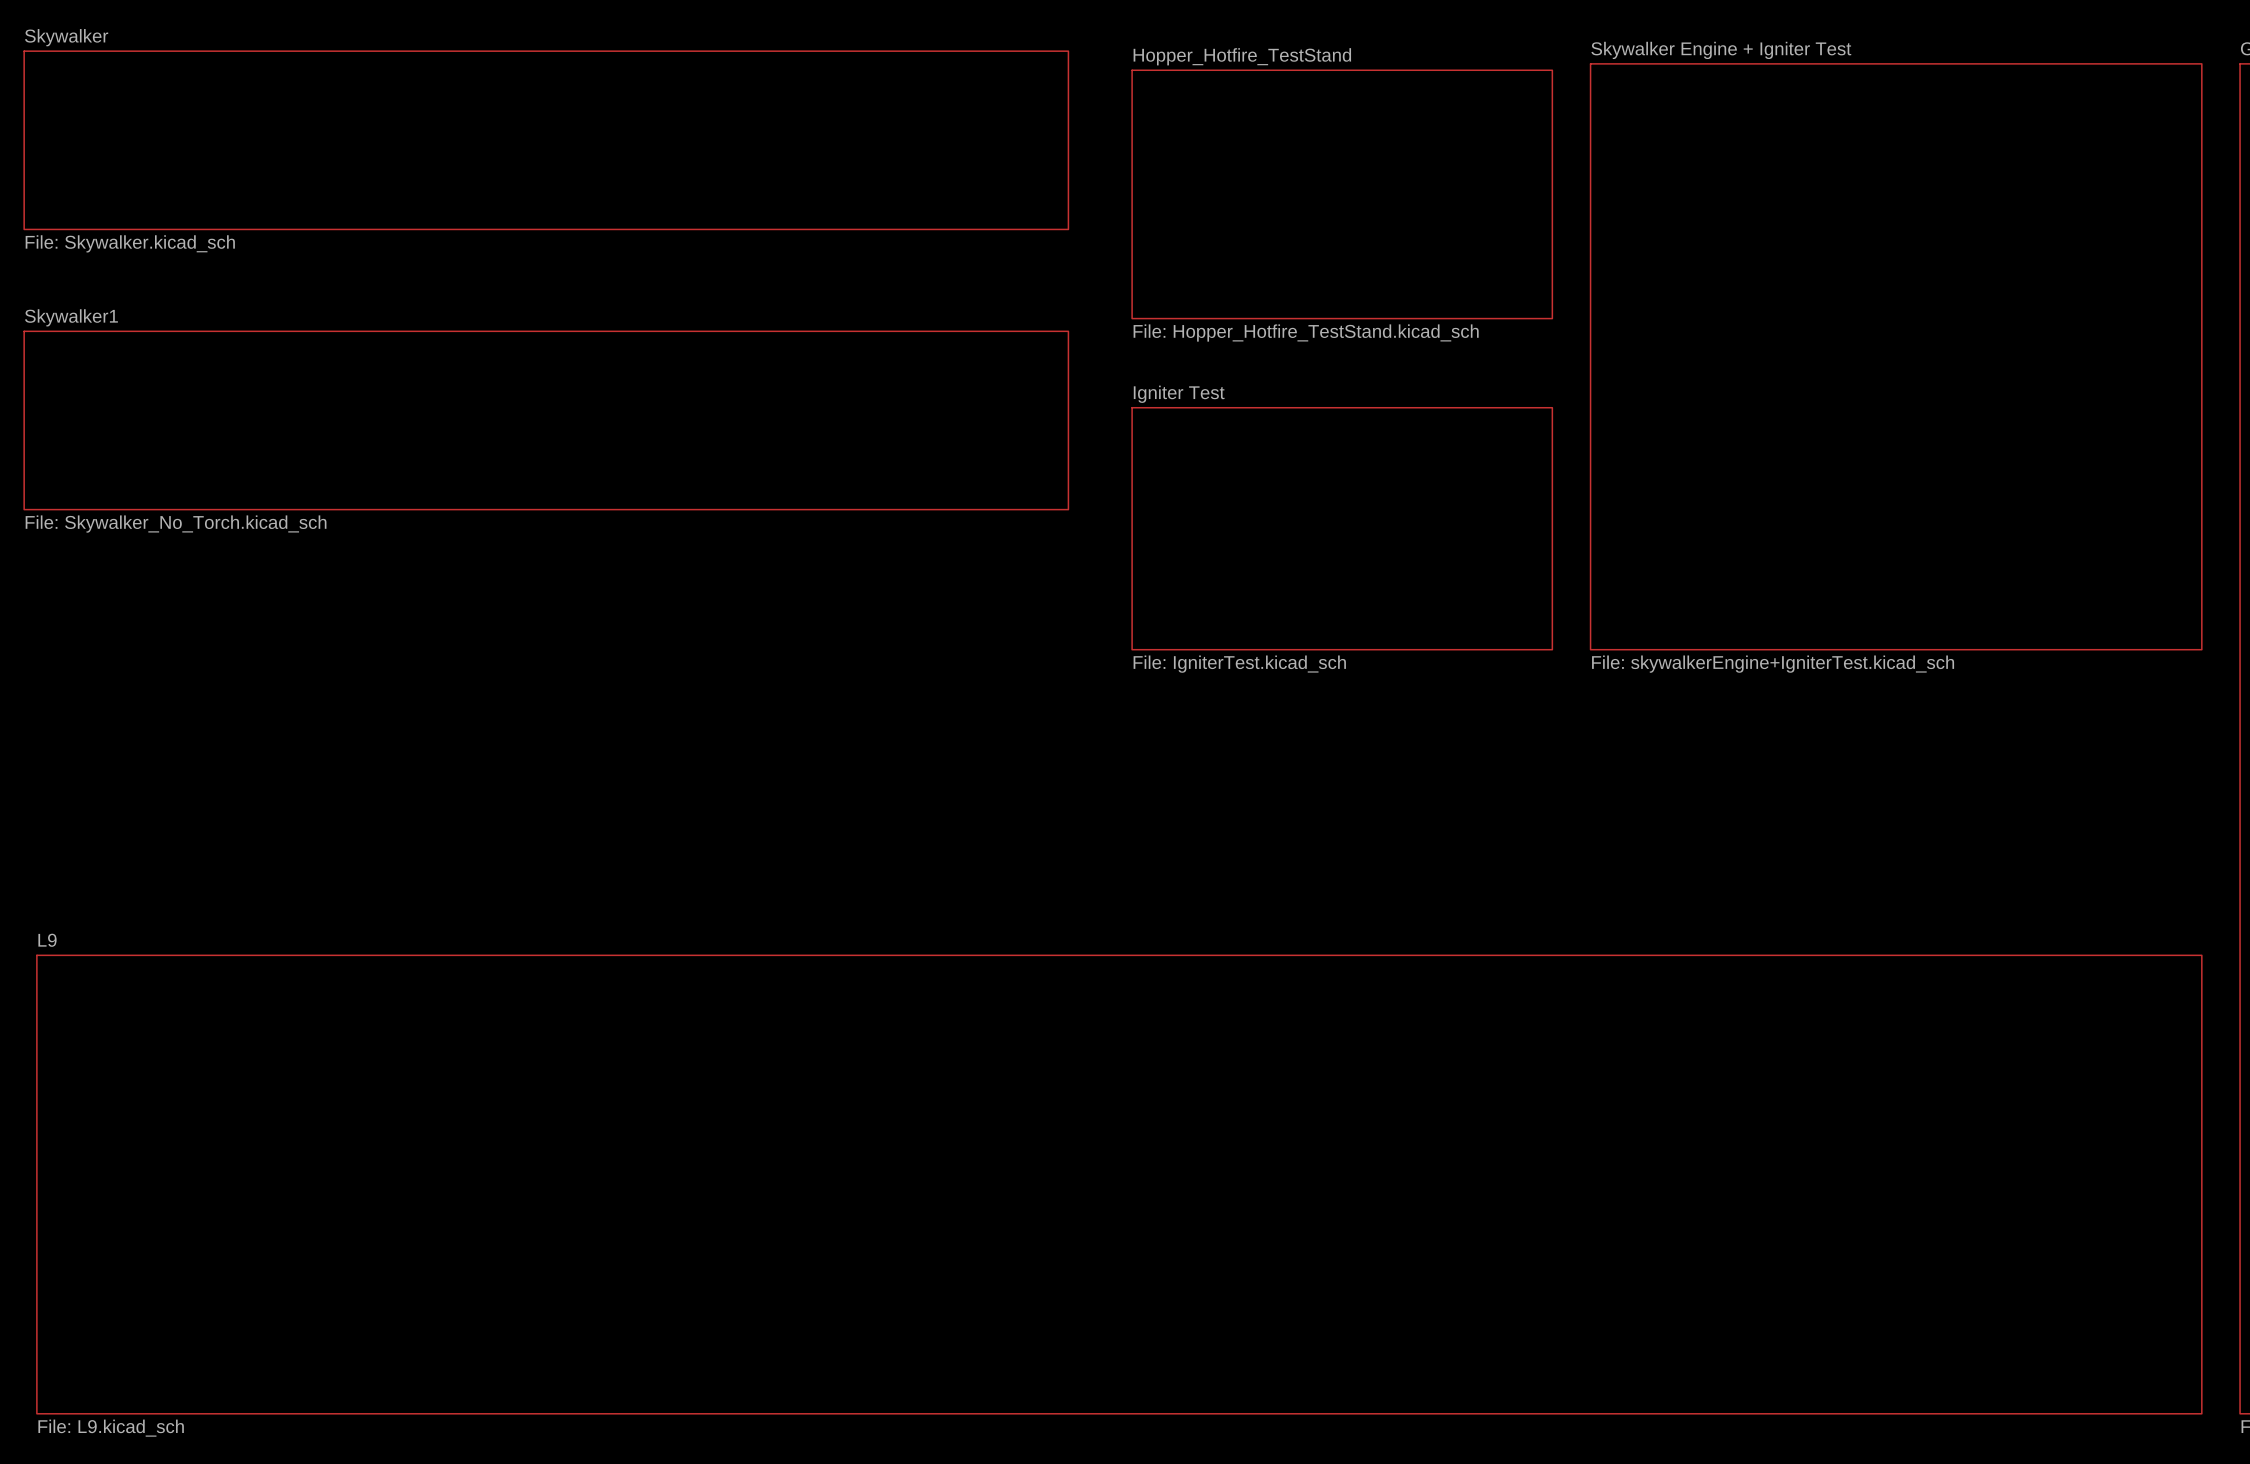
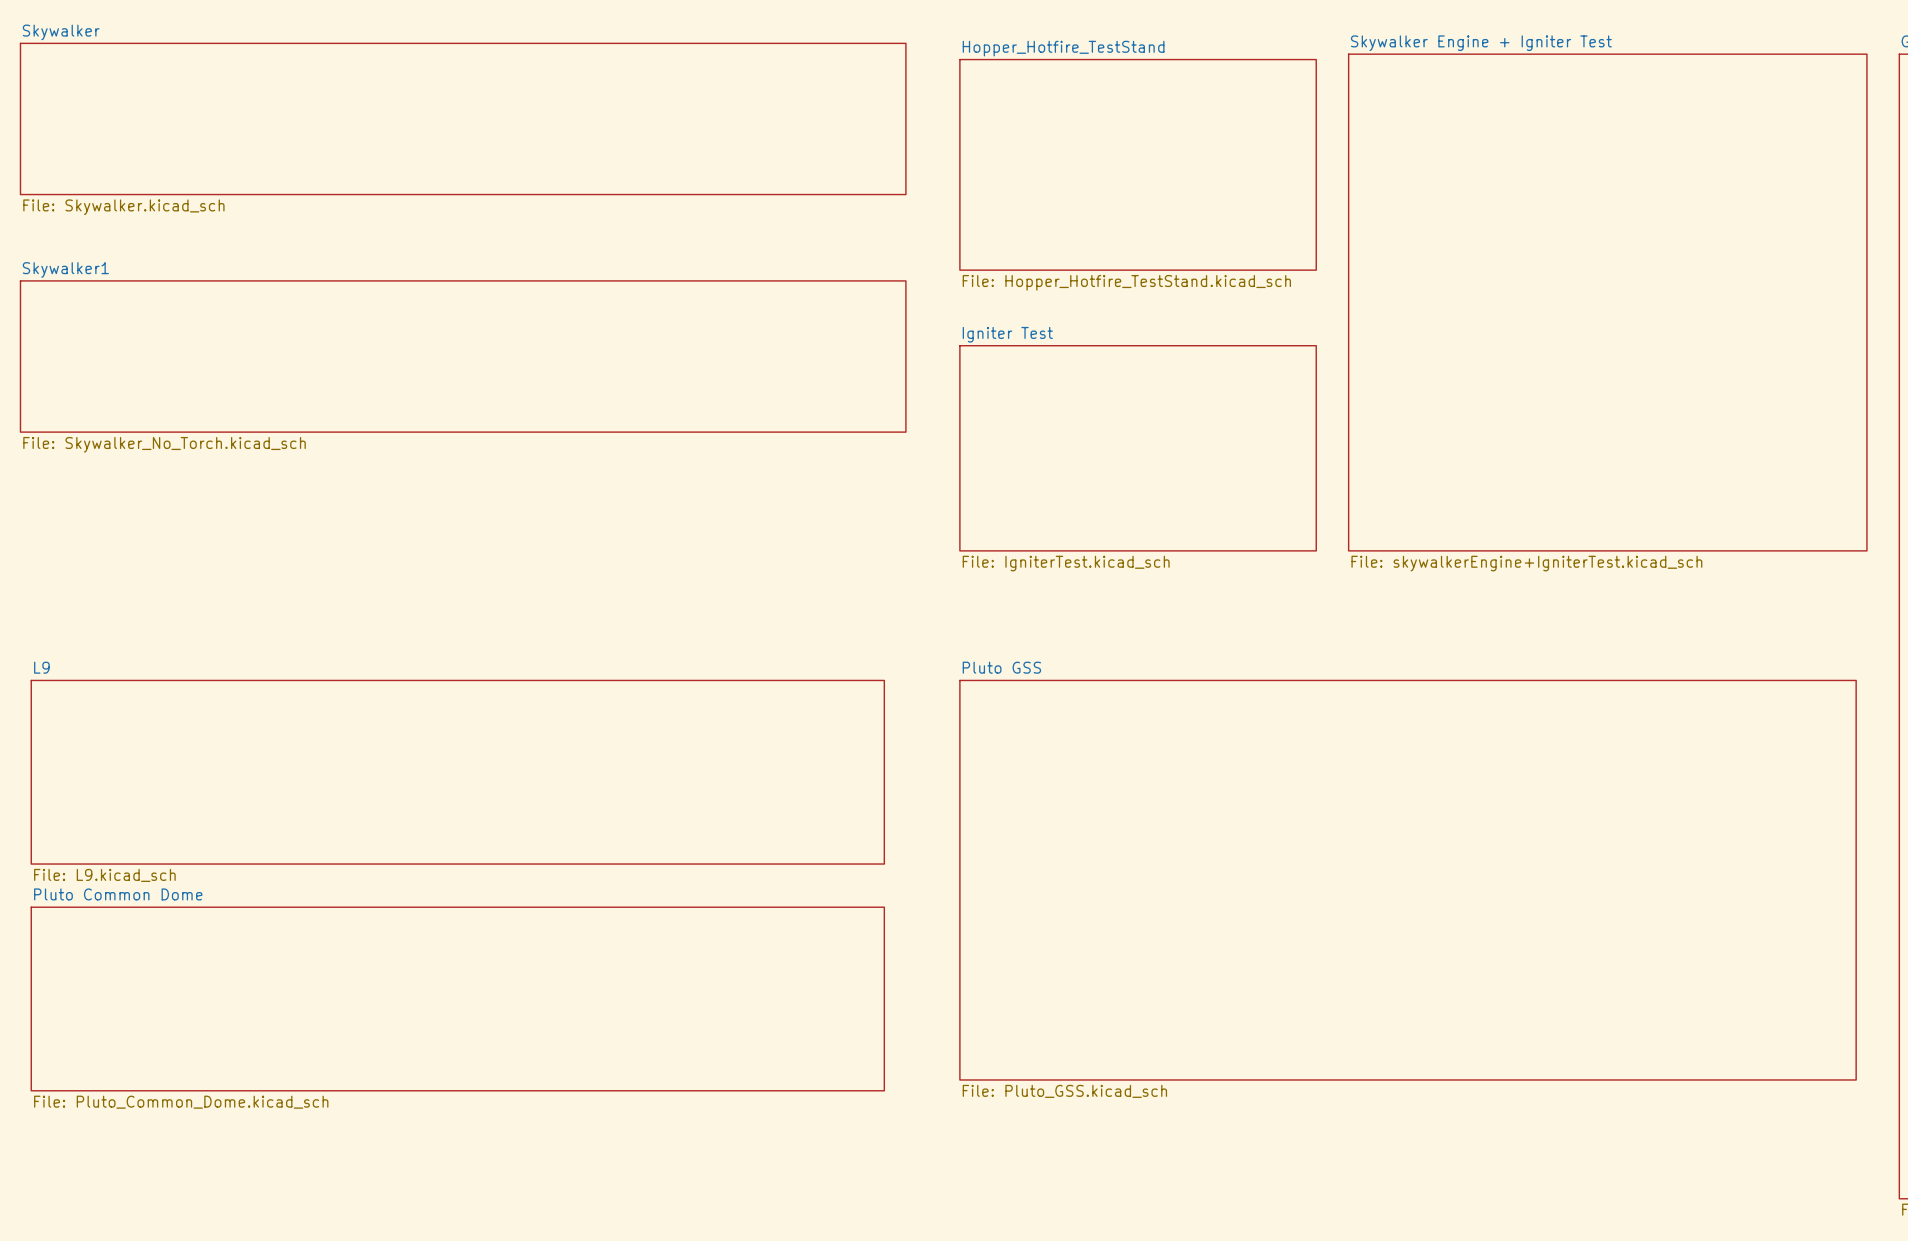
sheet L9 name position: L9 (47, 940) -> L9 (41, 667)
sheet L9 shape: [36, 954, 2203, 1415] -> [30, 679, 885, 865]
sheet Pluto GSS: none -> File: Pluto_GSS.kicad_sch (1408, 880)
sheet Pluto Common Dome: none -> File: Pluto_Common_Dome.kicad_sch (457, 999)
sheet L9 value position: File: L9.kicad_sch (111, 1428) -> File: L9.kicad_sch (104, 875)

